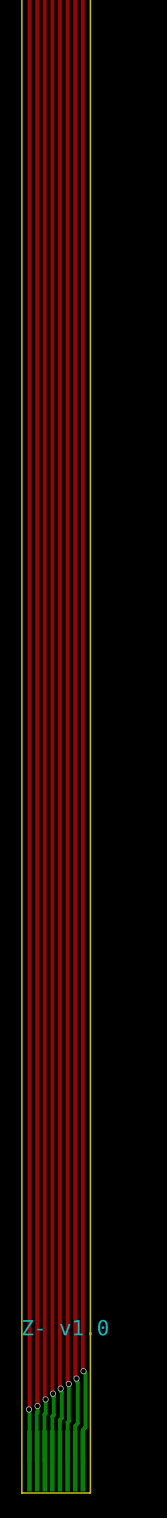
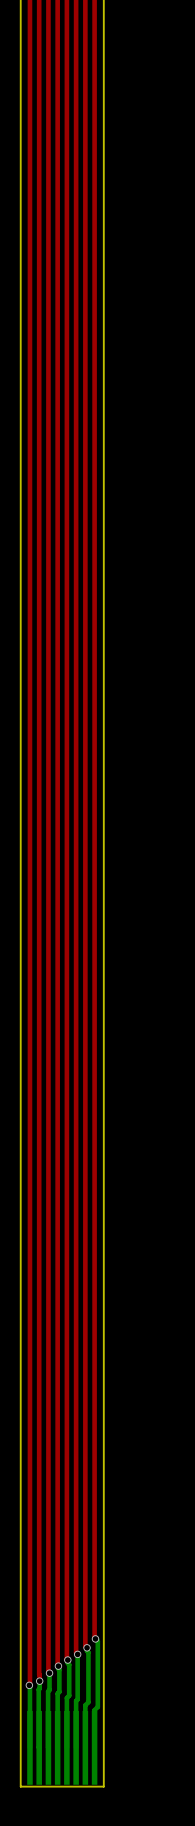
text: Z- v1.0 (65, 1327) -> none

